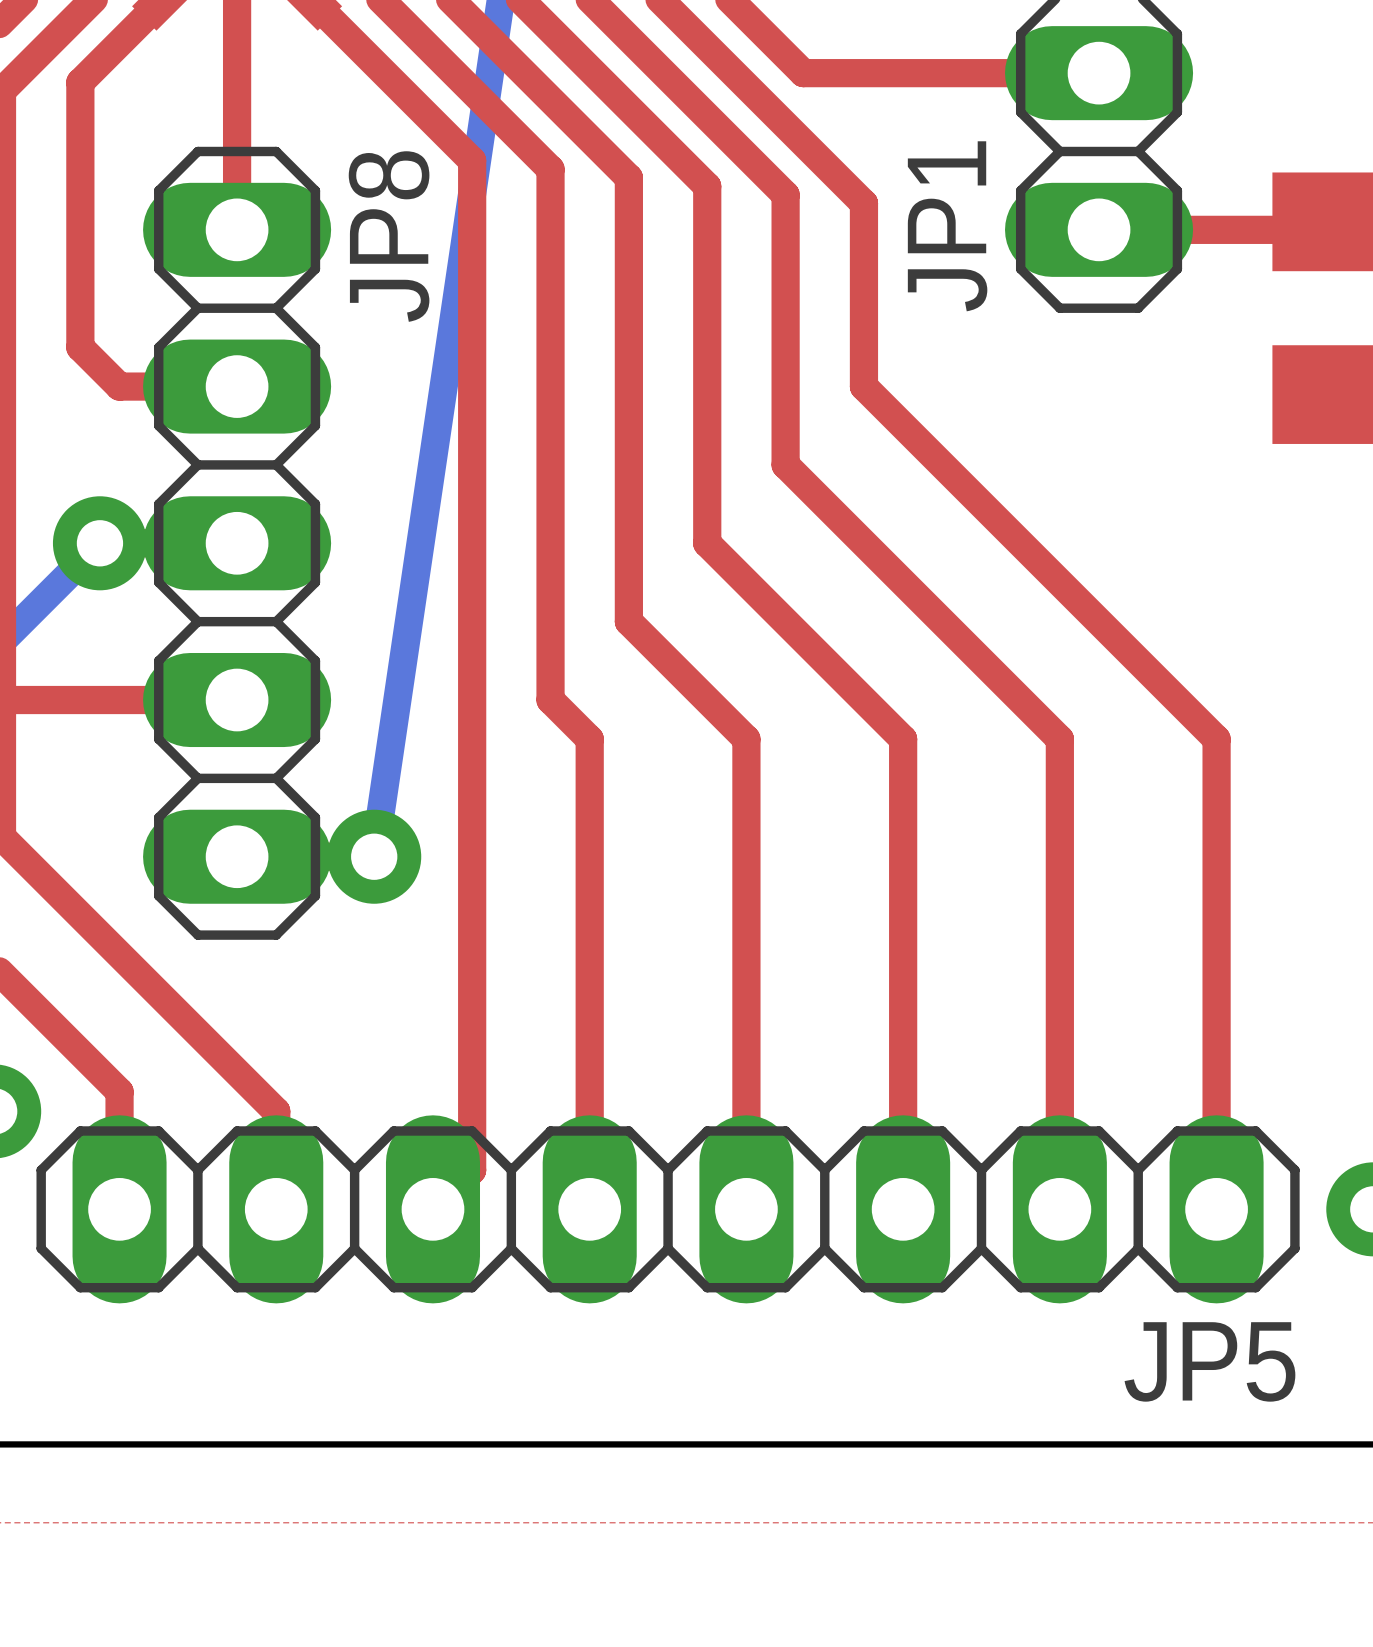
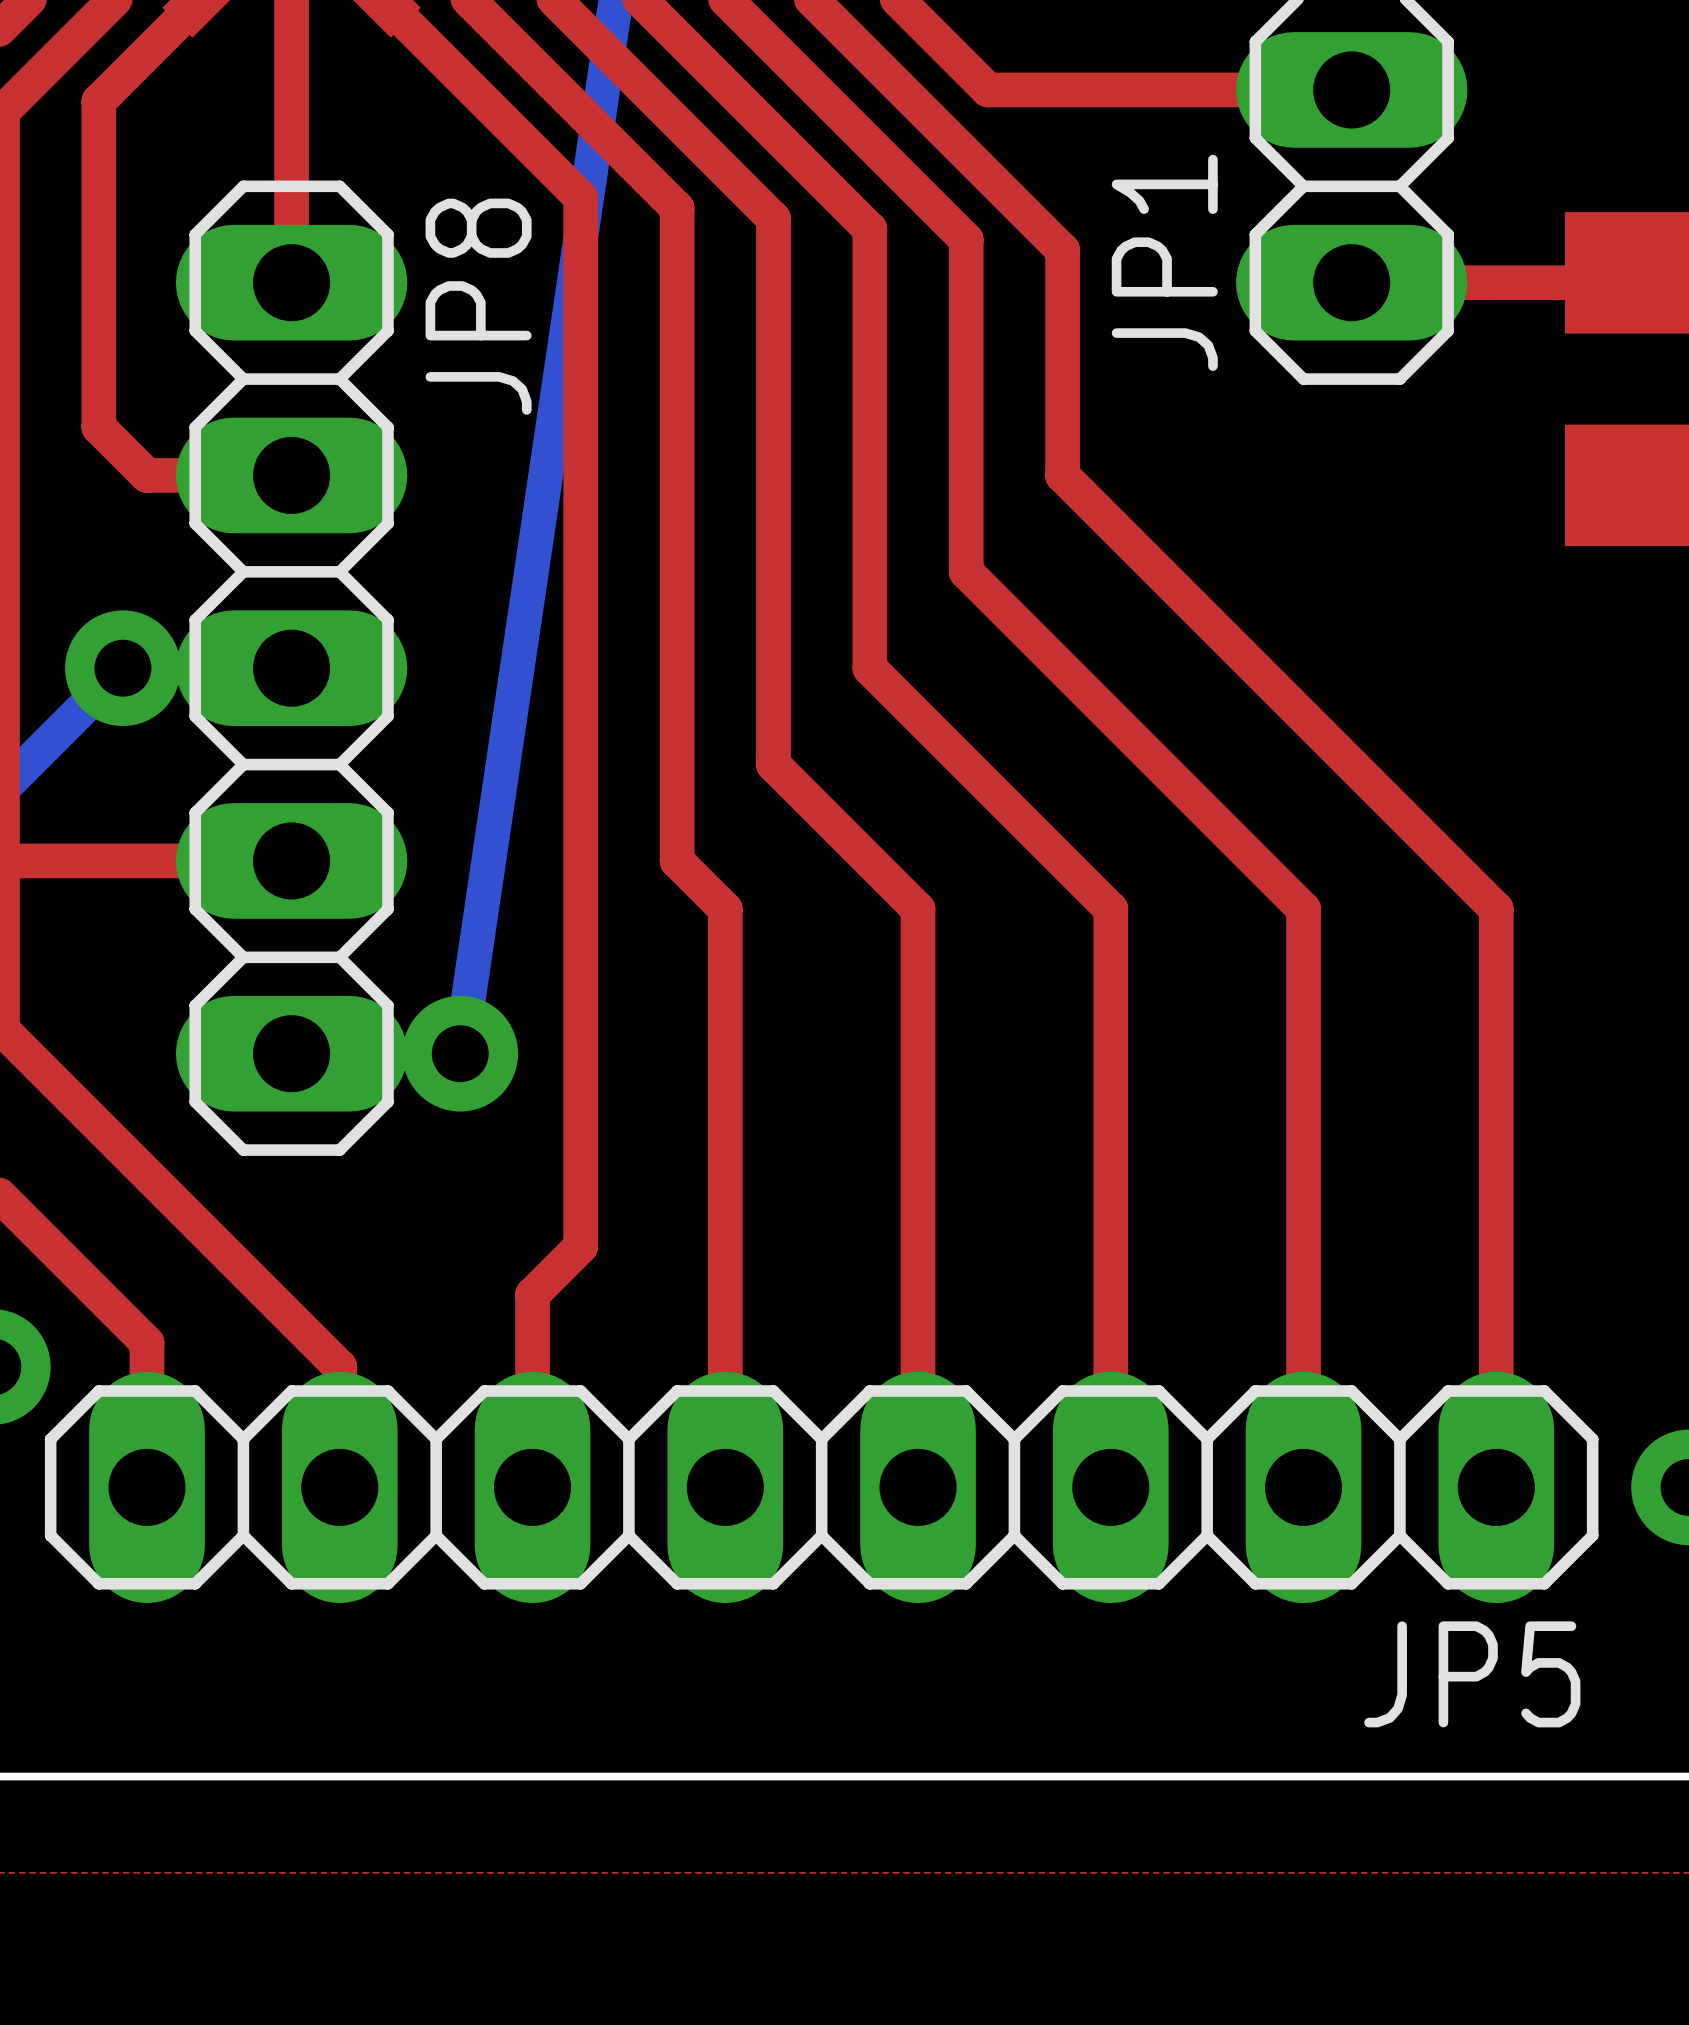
top track: (472, 1013) (472, 1170) (432, 1209) -> (580, 1246) (532, 1294) (532, 1487)

